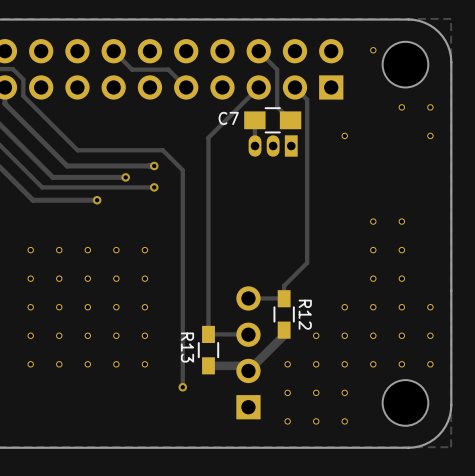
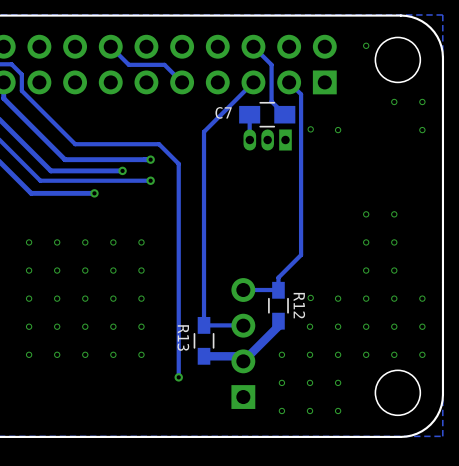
part: none -> (310, 129)
part: none -> (310, 297)

